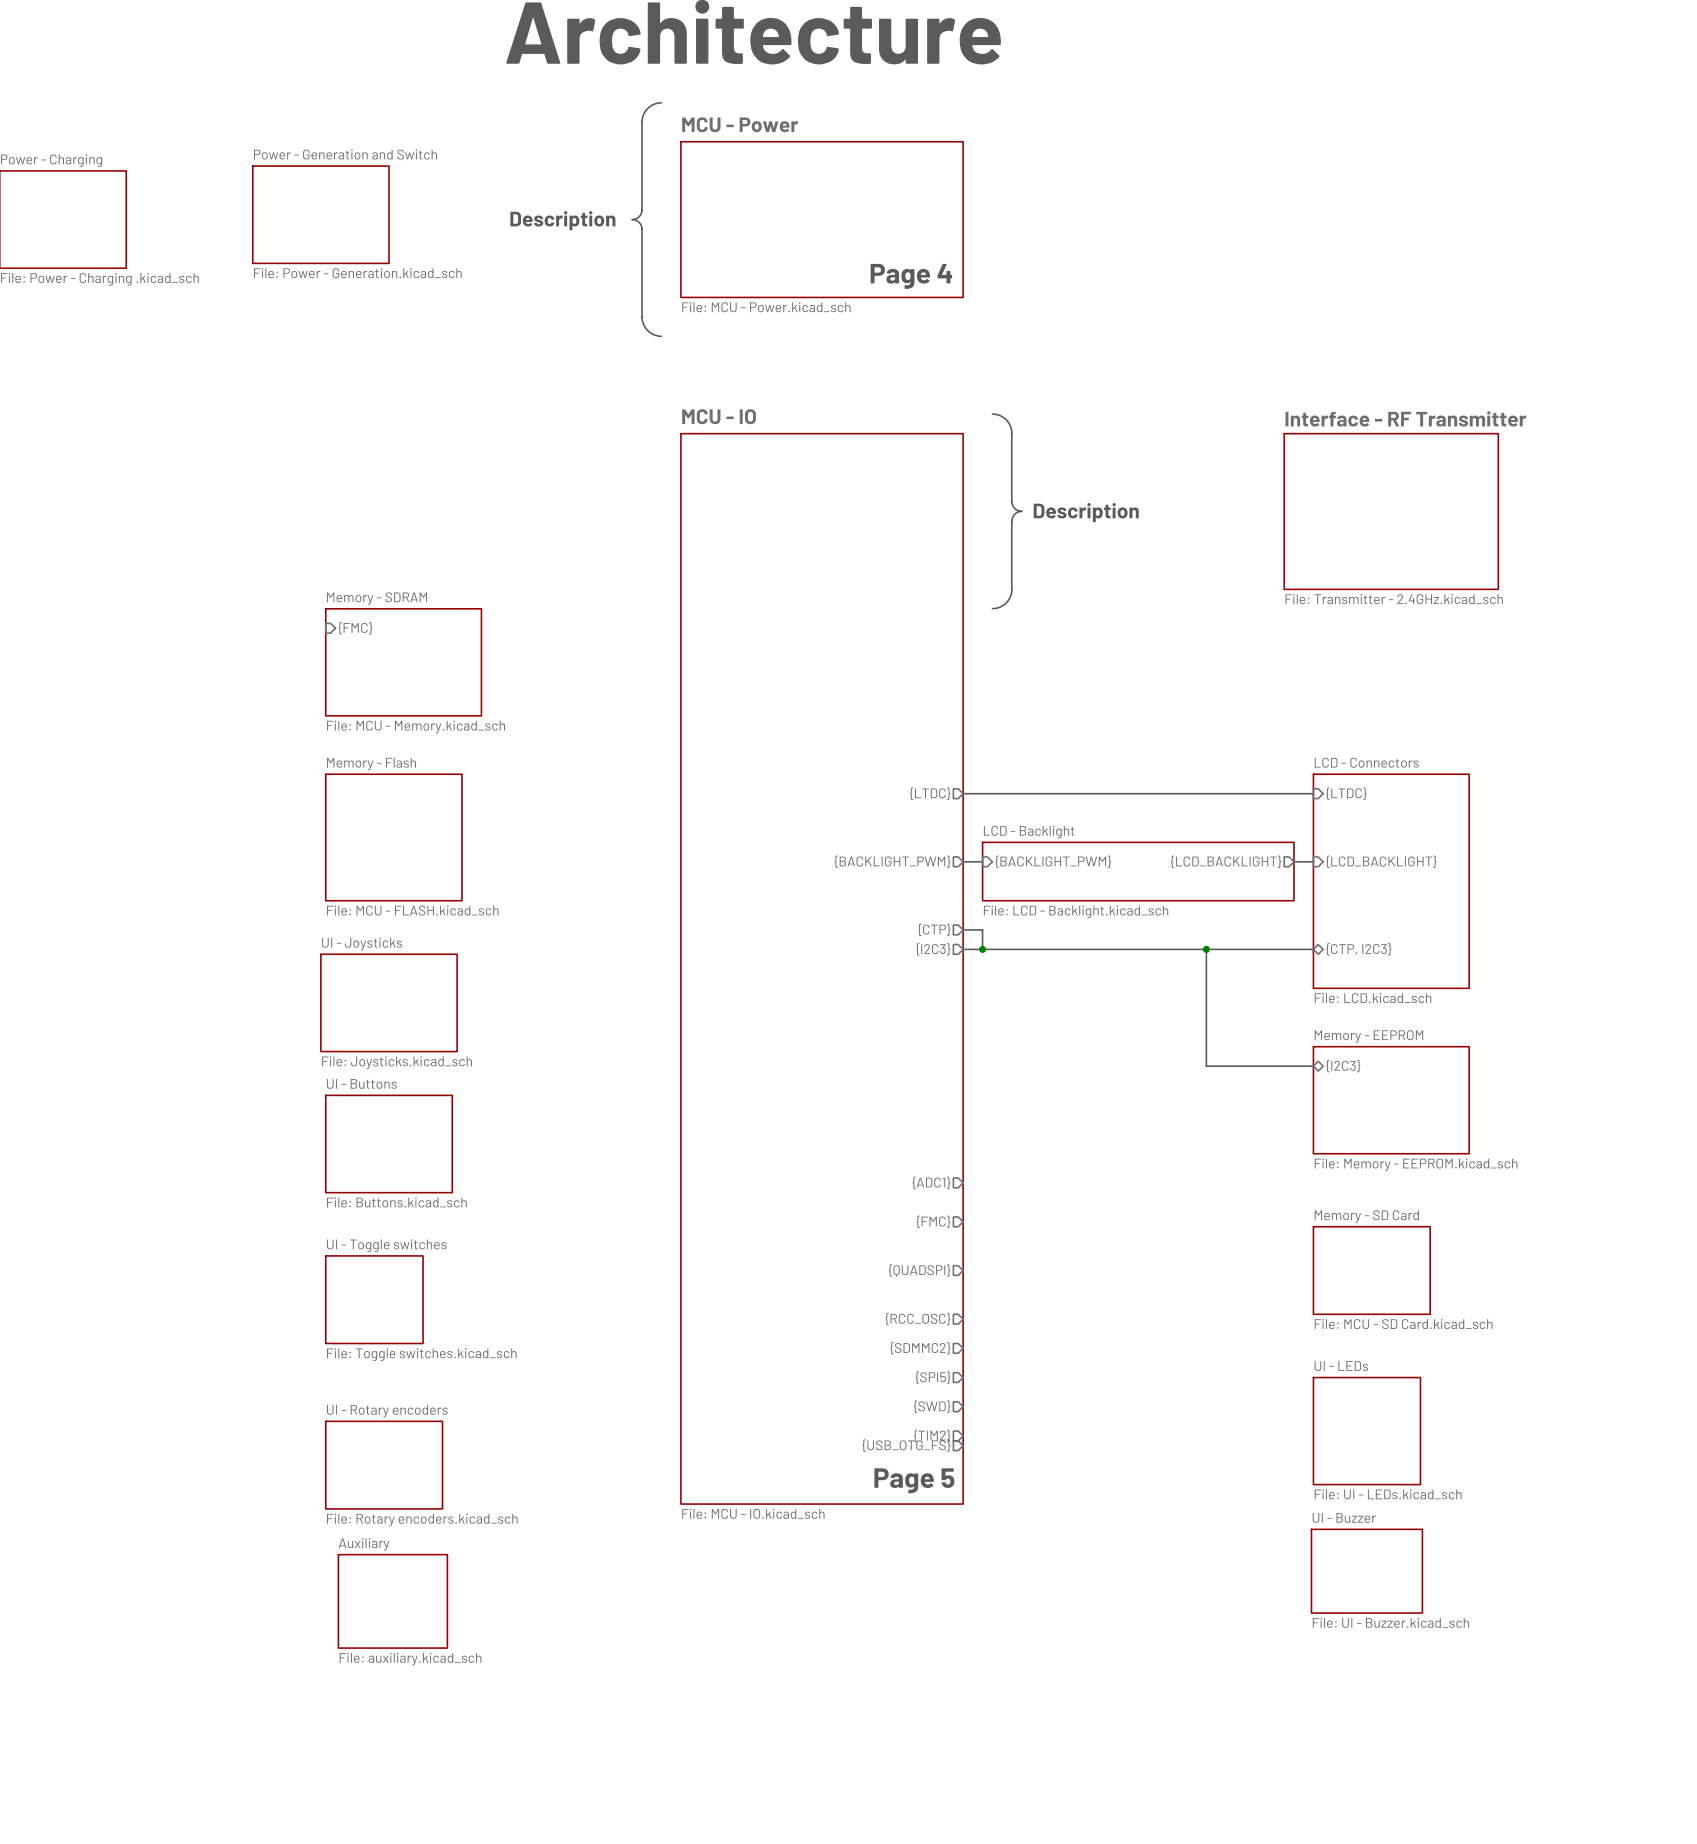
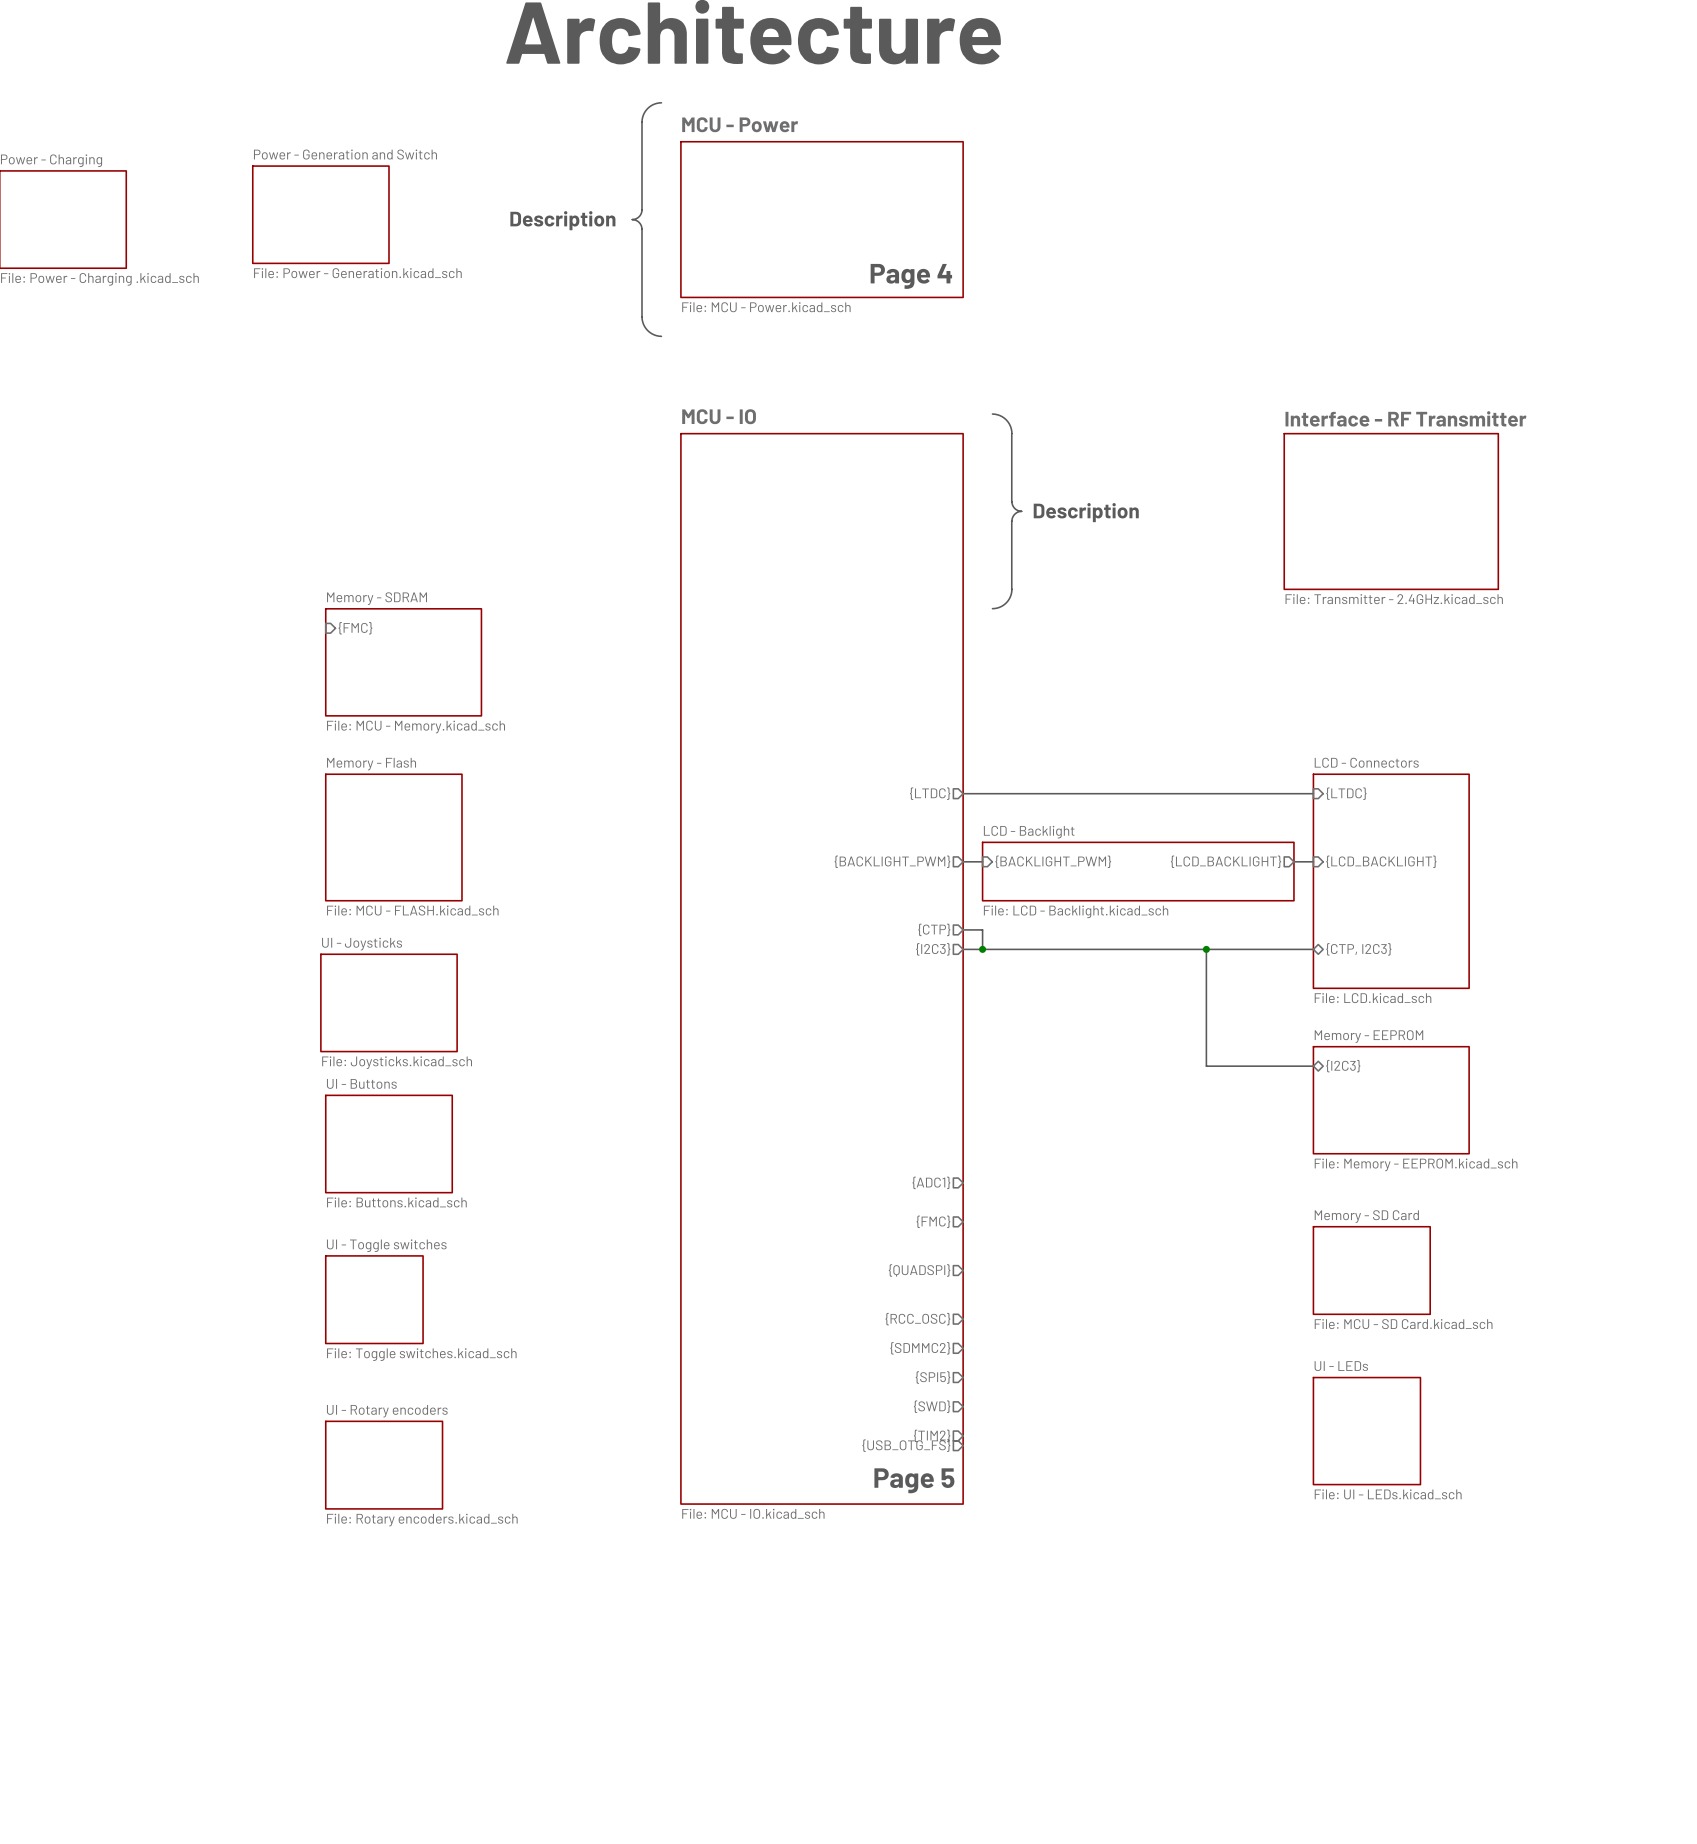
sheet UI - Buzzer: File: UI - Buzzer.kicad_sch (1366, 1571) -> none
sheet Auxiliary: File: auxiliary.kicad_sch (392, 1601) -> none

